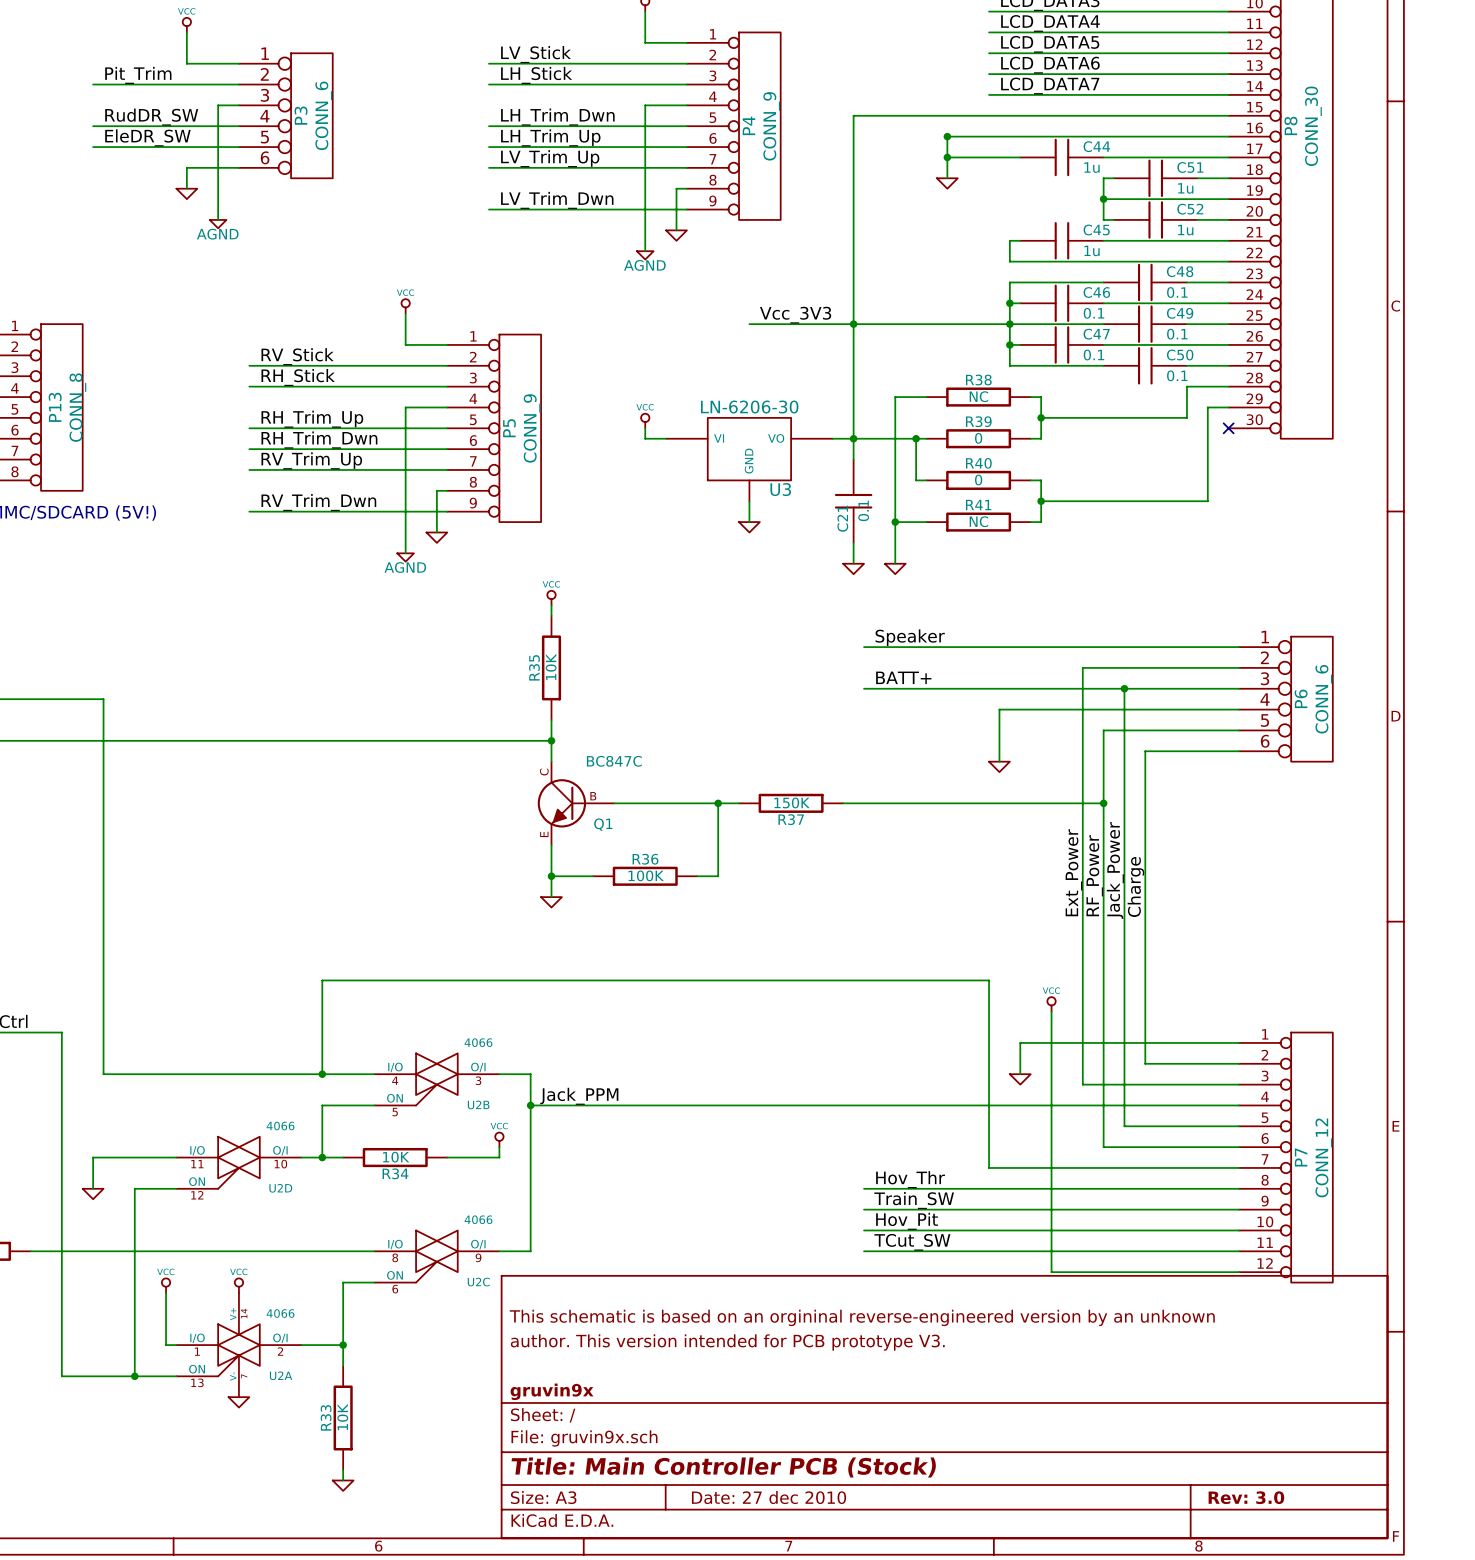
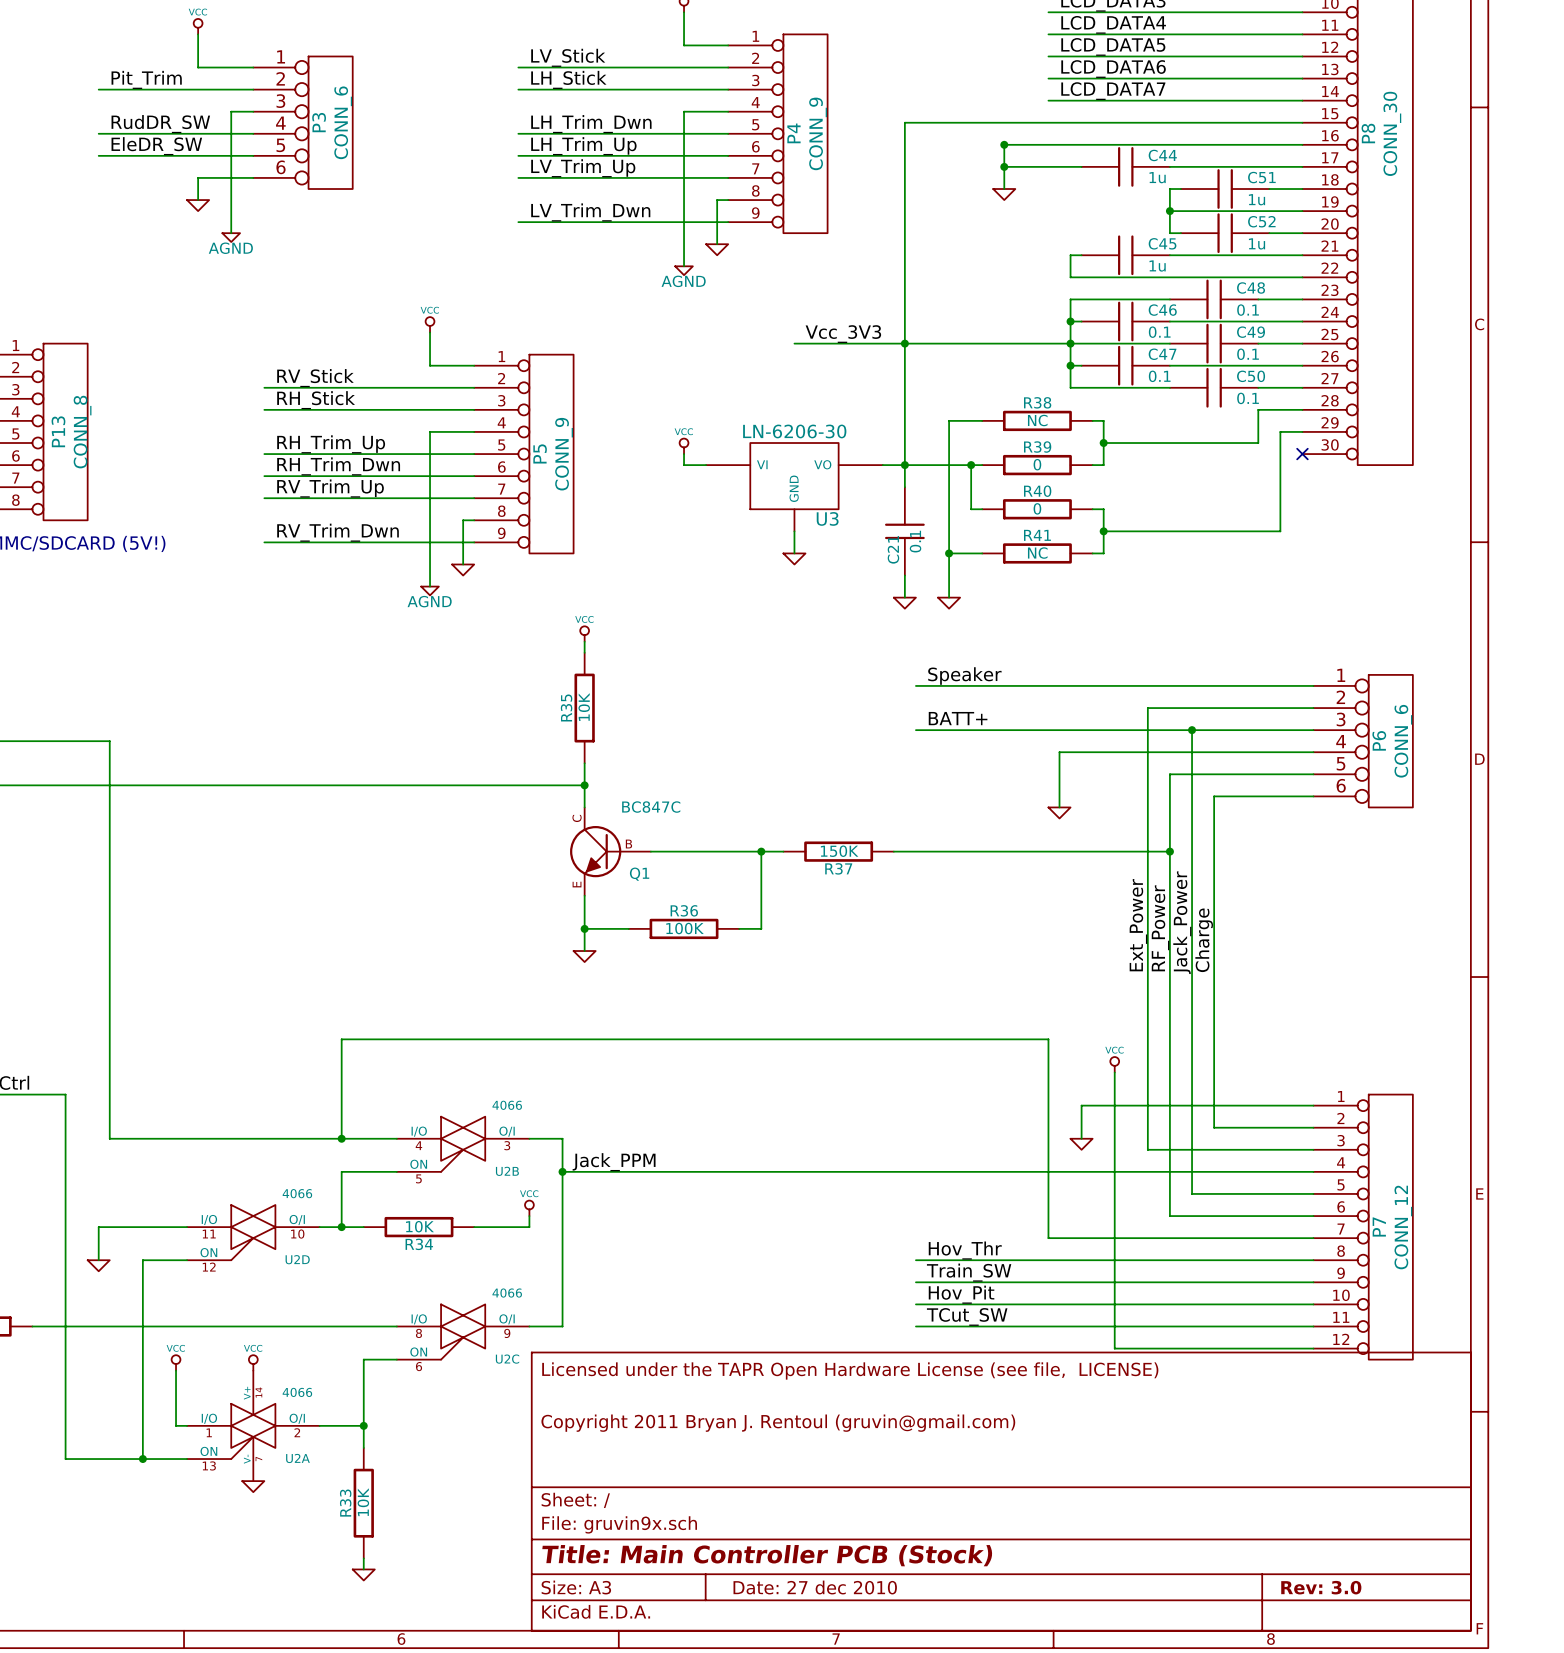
title block: none -> Licensed under the TAPR Open Hardware License (see file, LICENSE) (850, 1370)
title block: This schematic is based on an orgininal reverse-engineered version by an unknown (862, 1317) -> none
title block: author. This version intended for PCB prototype V3. (727, 1342) -> Copyright 2011 Bryan J. Rentoul (gruvin@gmail.com) (778, 1423)
title block: gruvin9x (551, 1391) -> none

